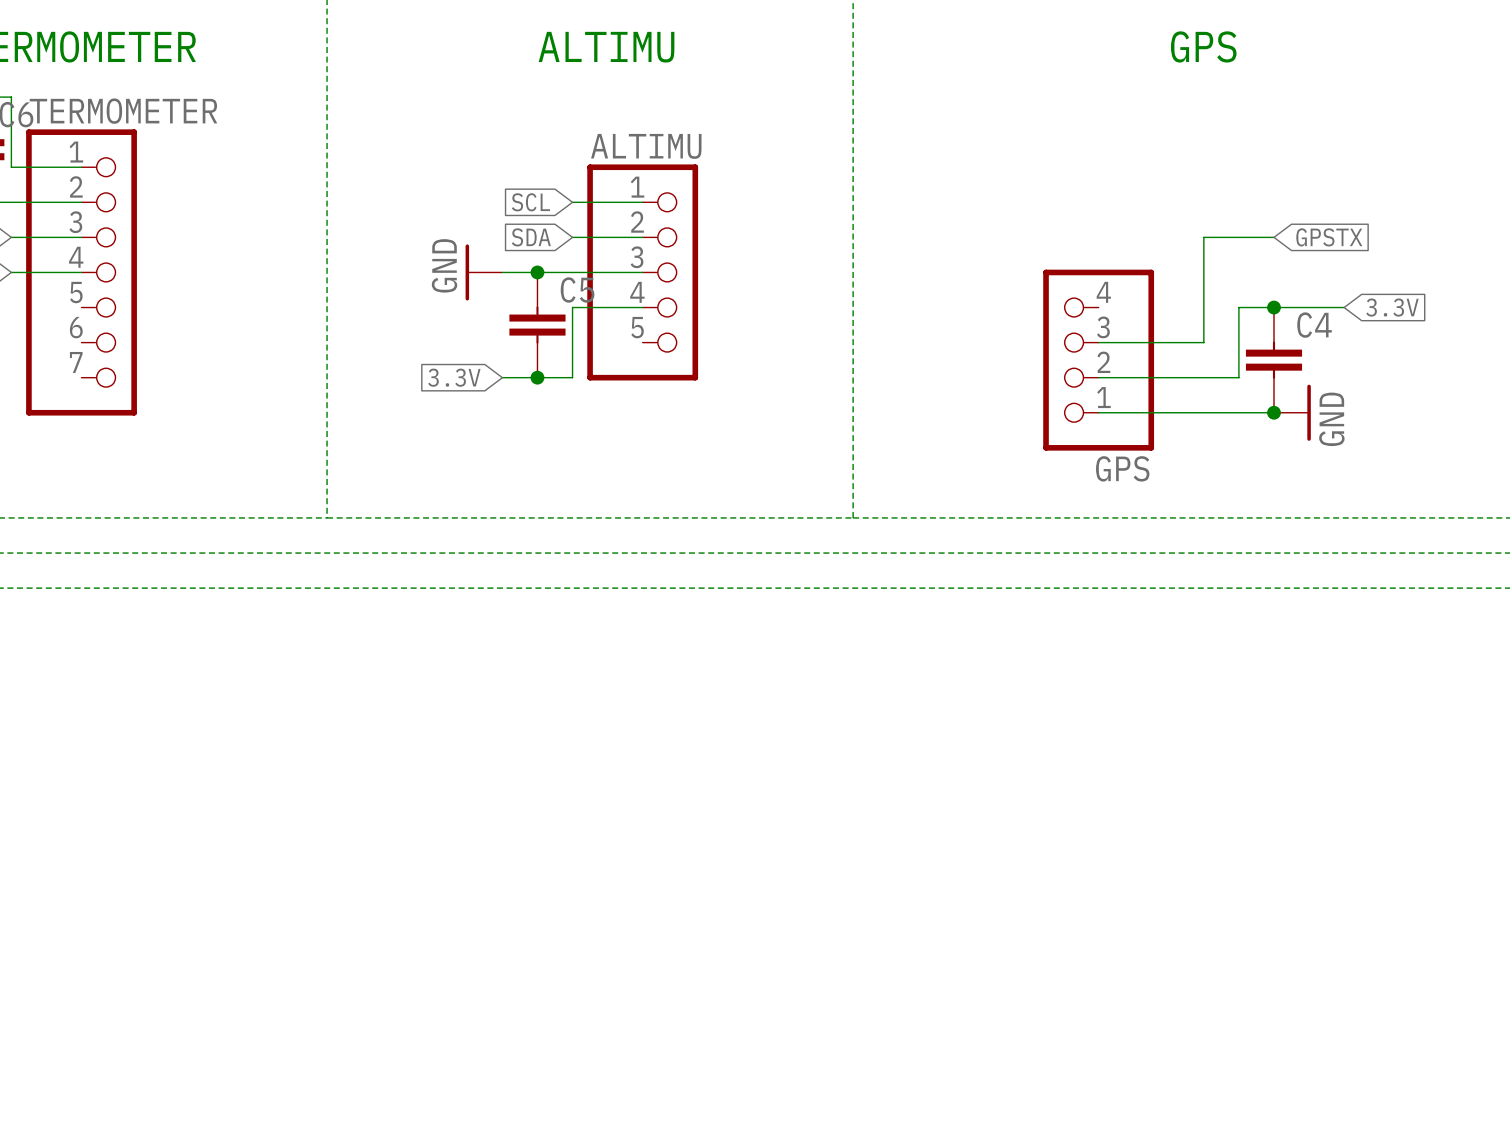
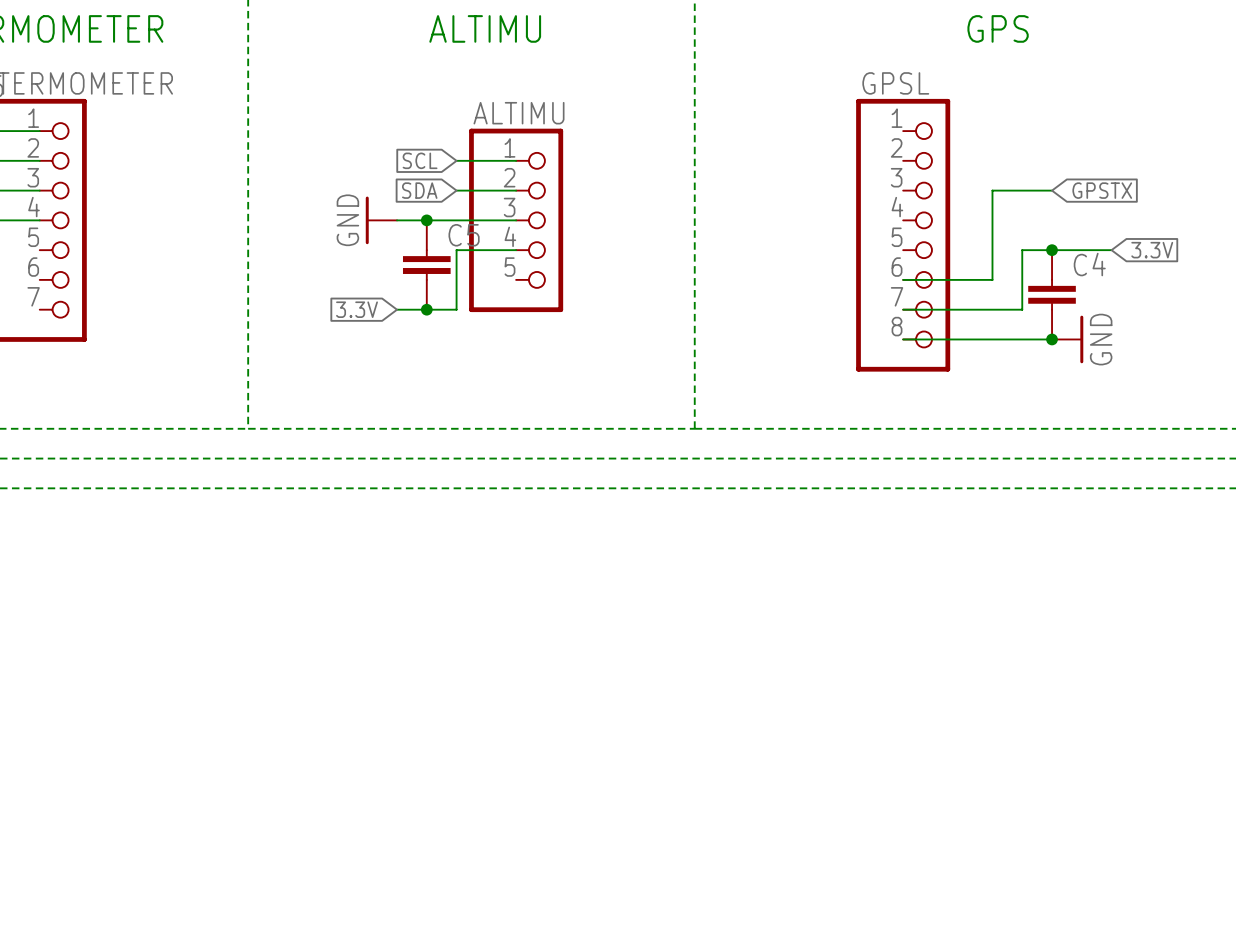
GPSL: none -> (903, 235)
GPS: (1098, 360) -> none

